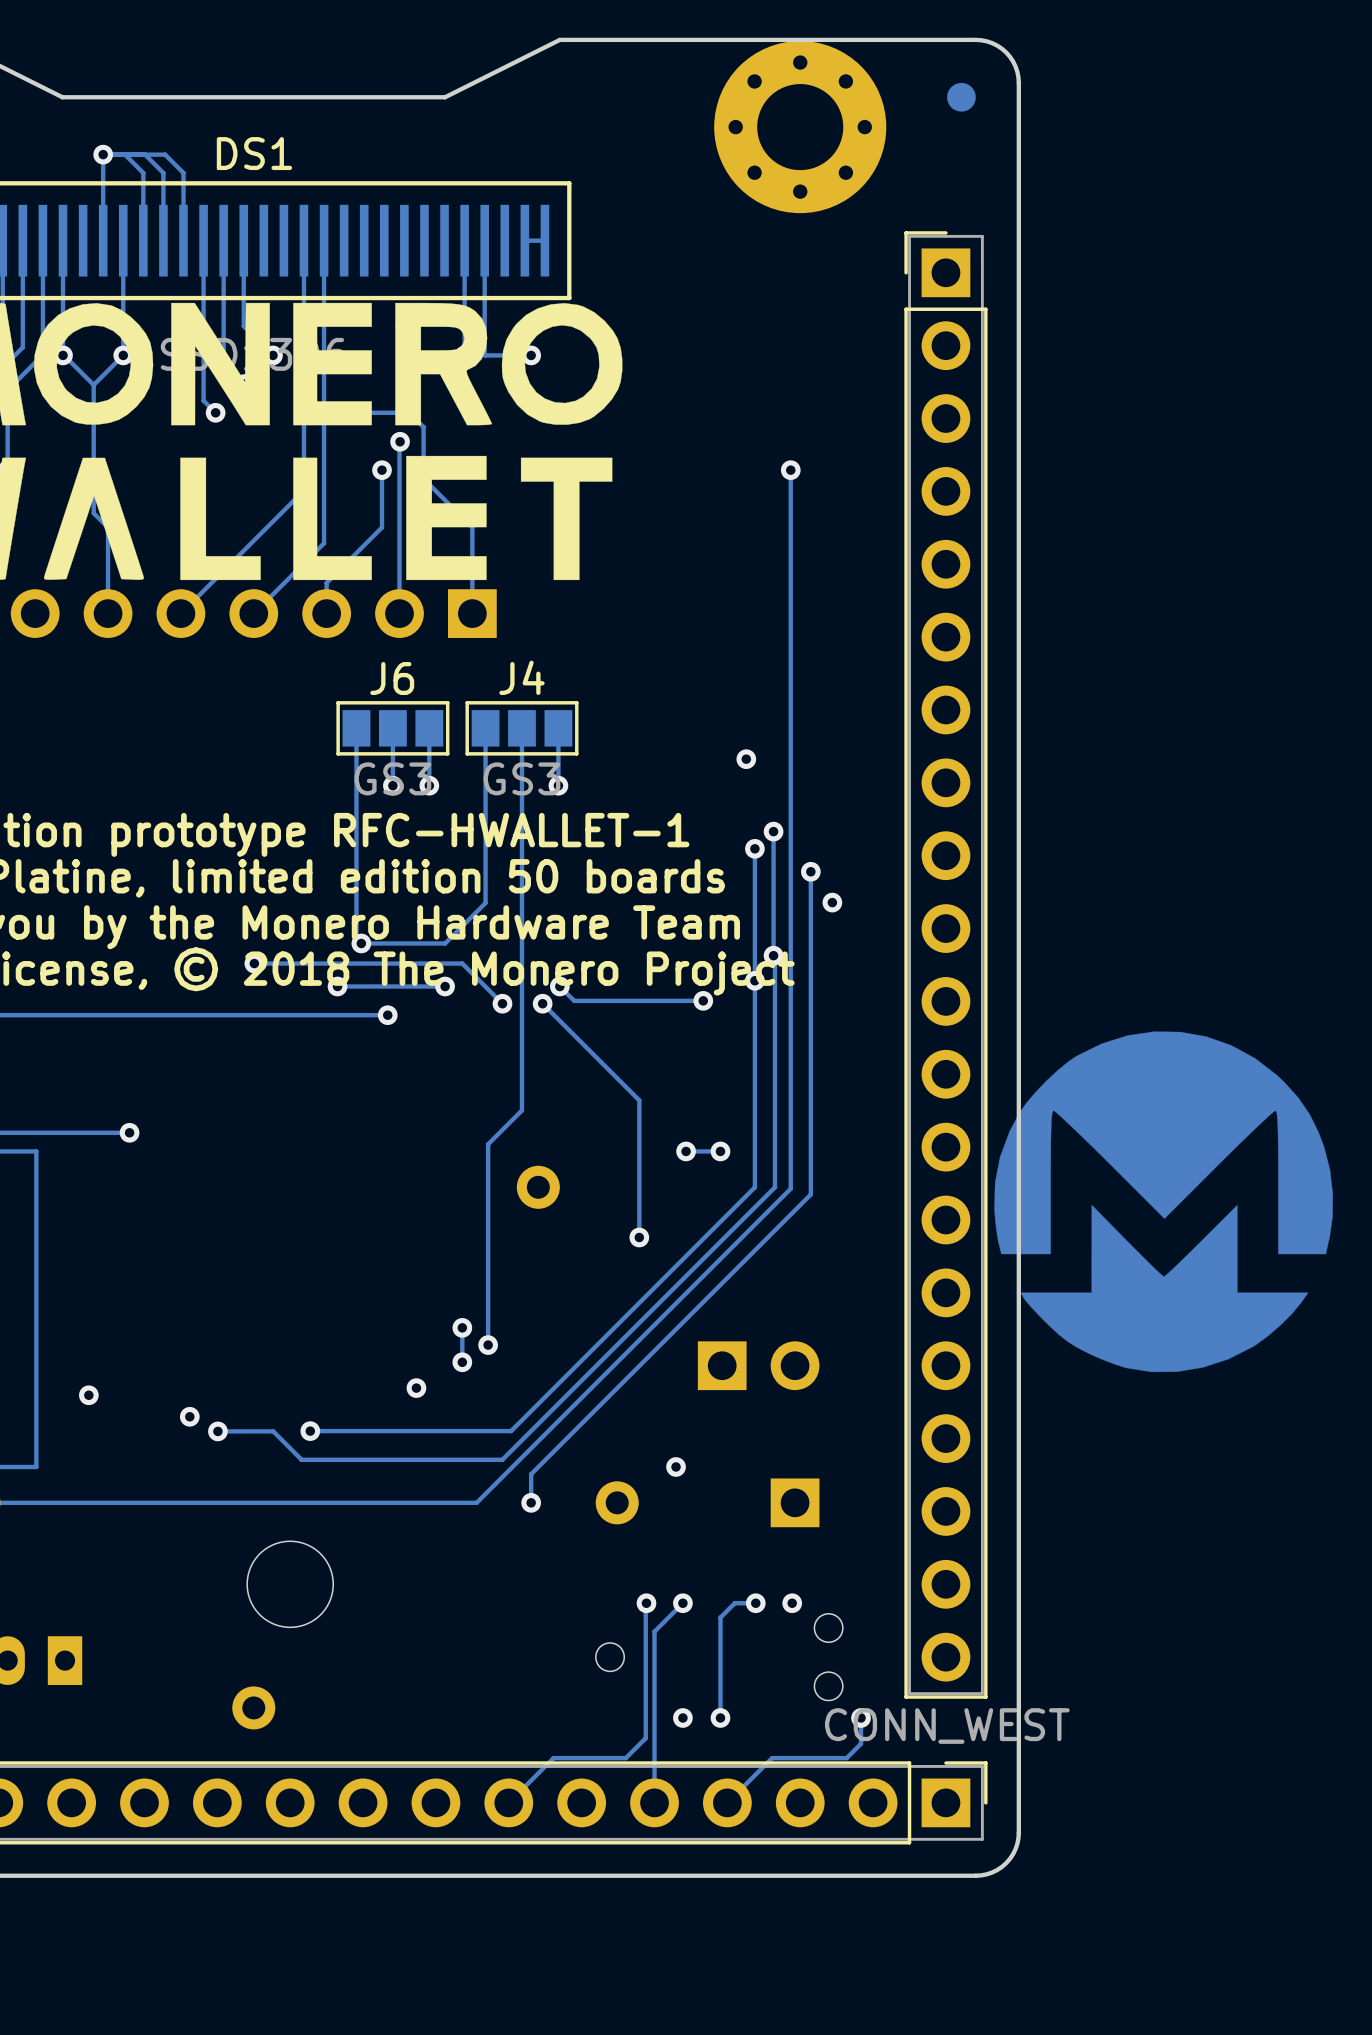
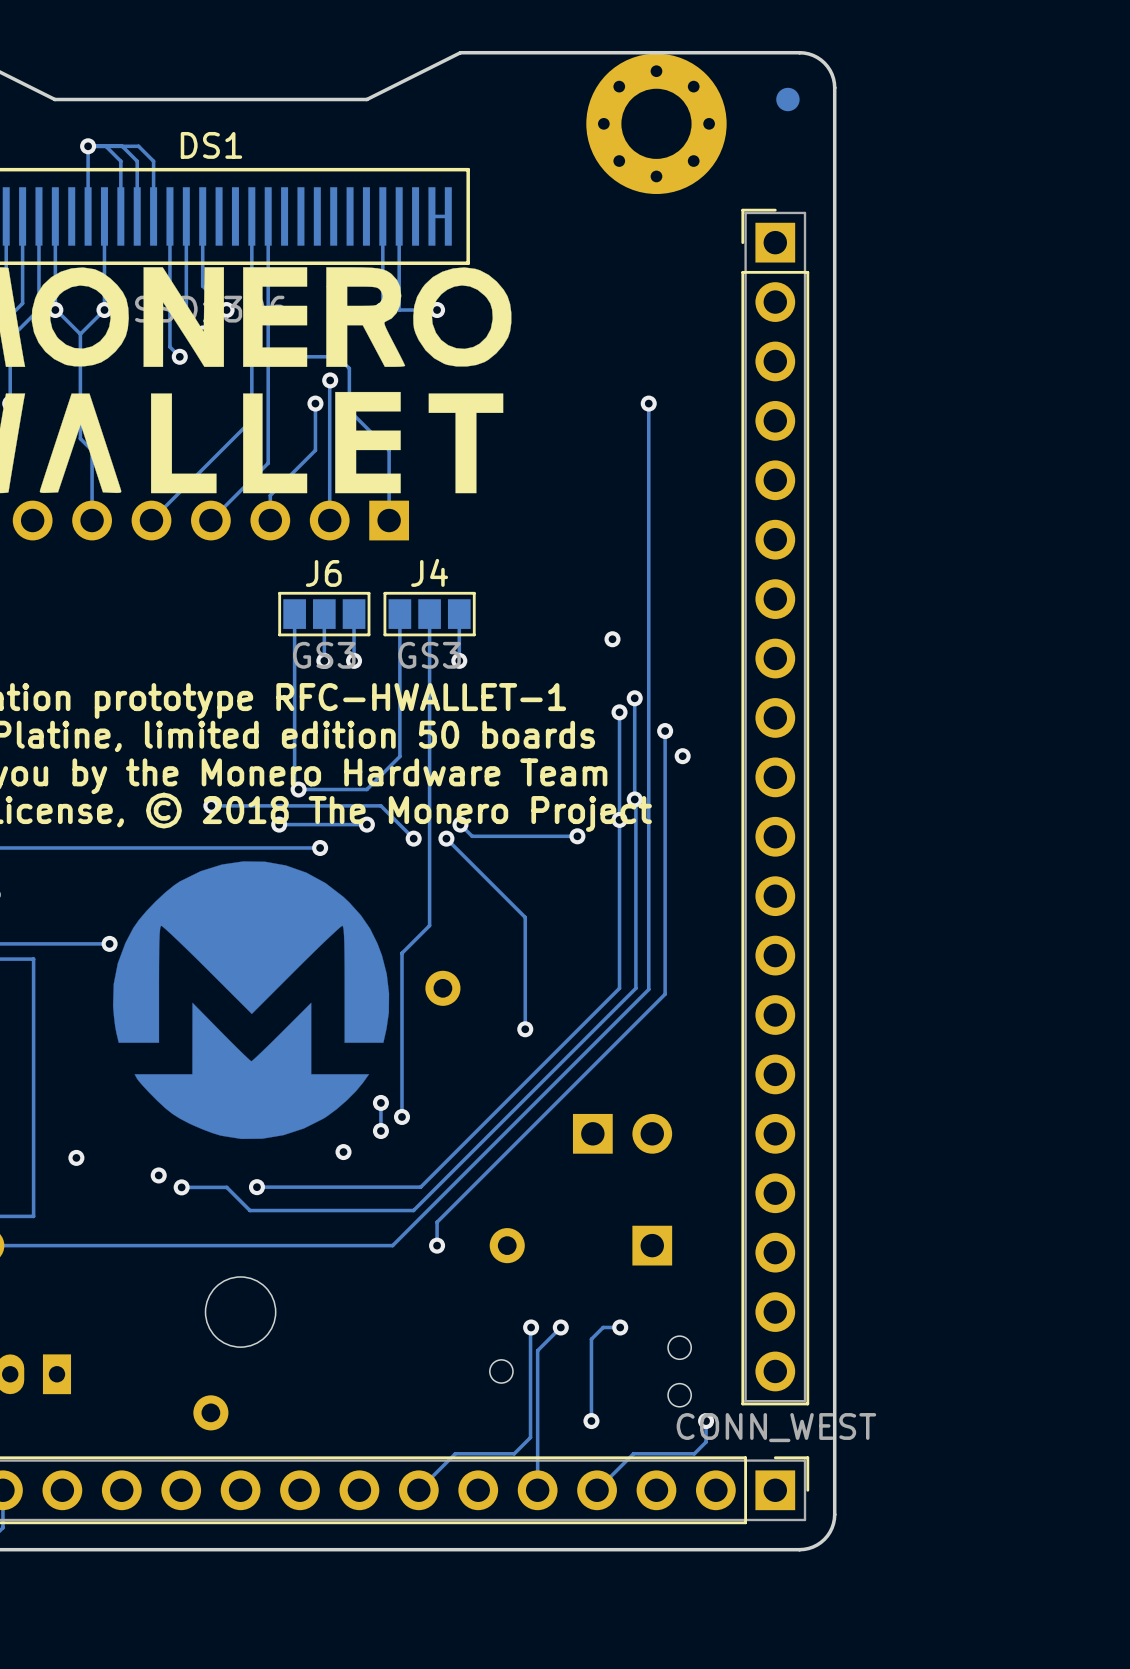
drawing: none -> [113, 861, 390, 1140]
drawing: [994, 1031, 1333, 1373] -> none
via: (686, 1151) -> none
track: (720, 1151) (686, 1151) -> none
via: (720, 1151) -> none
via: (676, 1466) -> none
via: (792, 1603) -> none
via: (682, 1717) -> none

